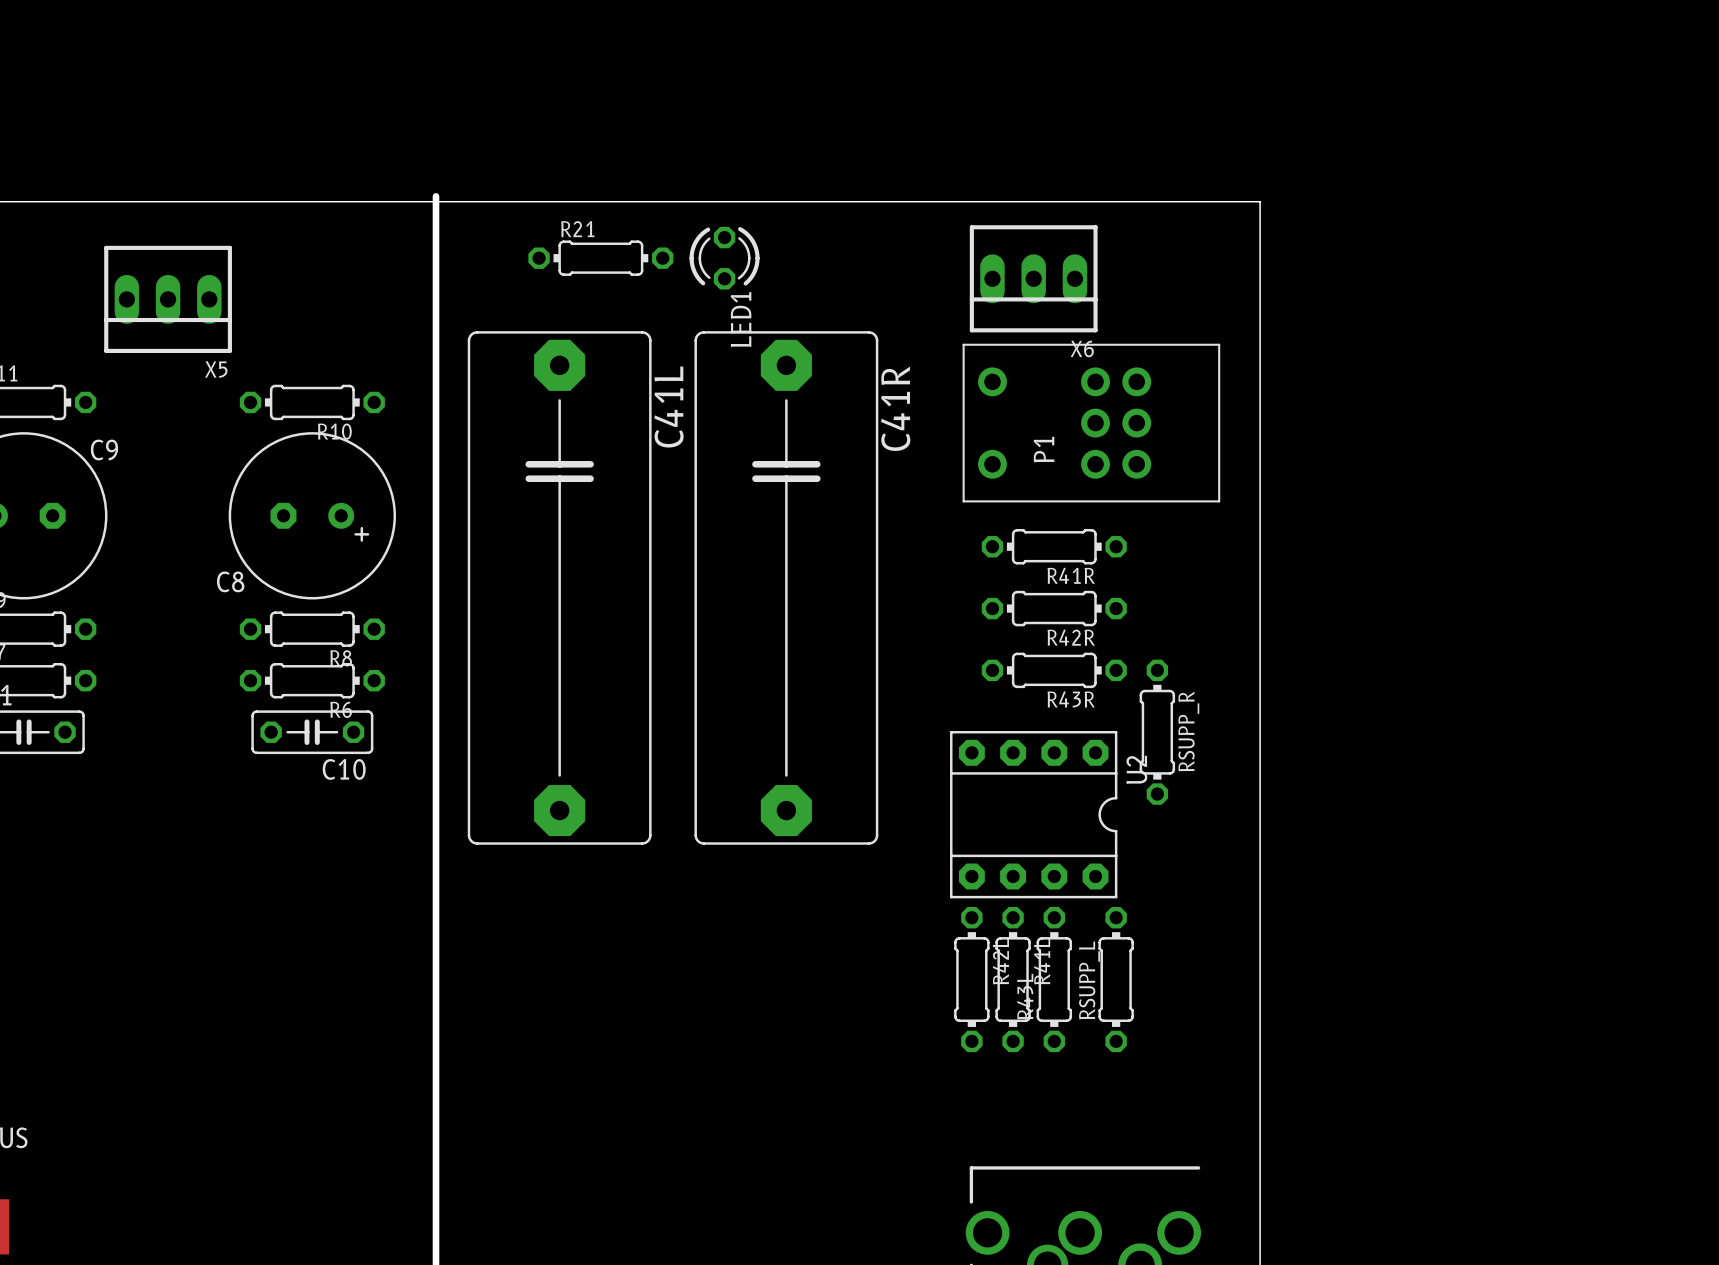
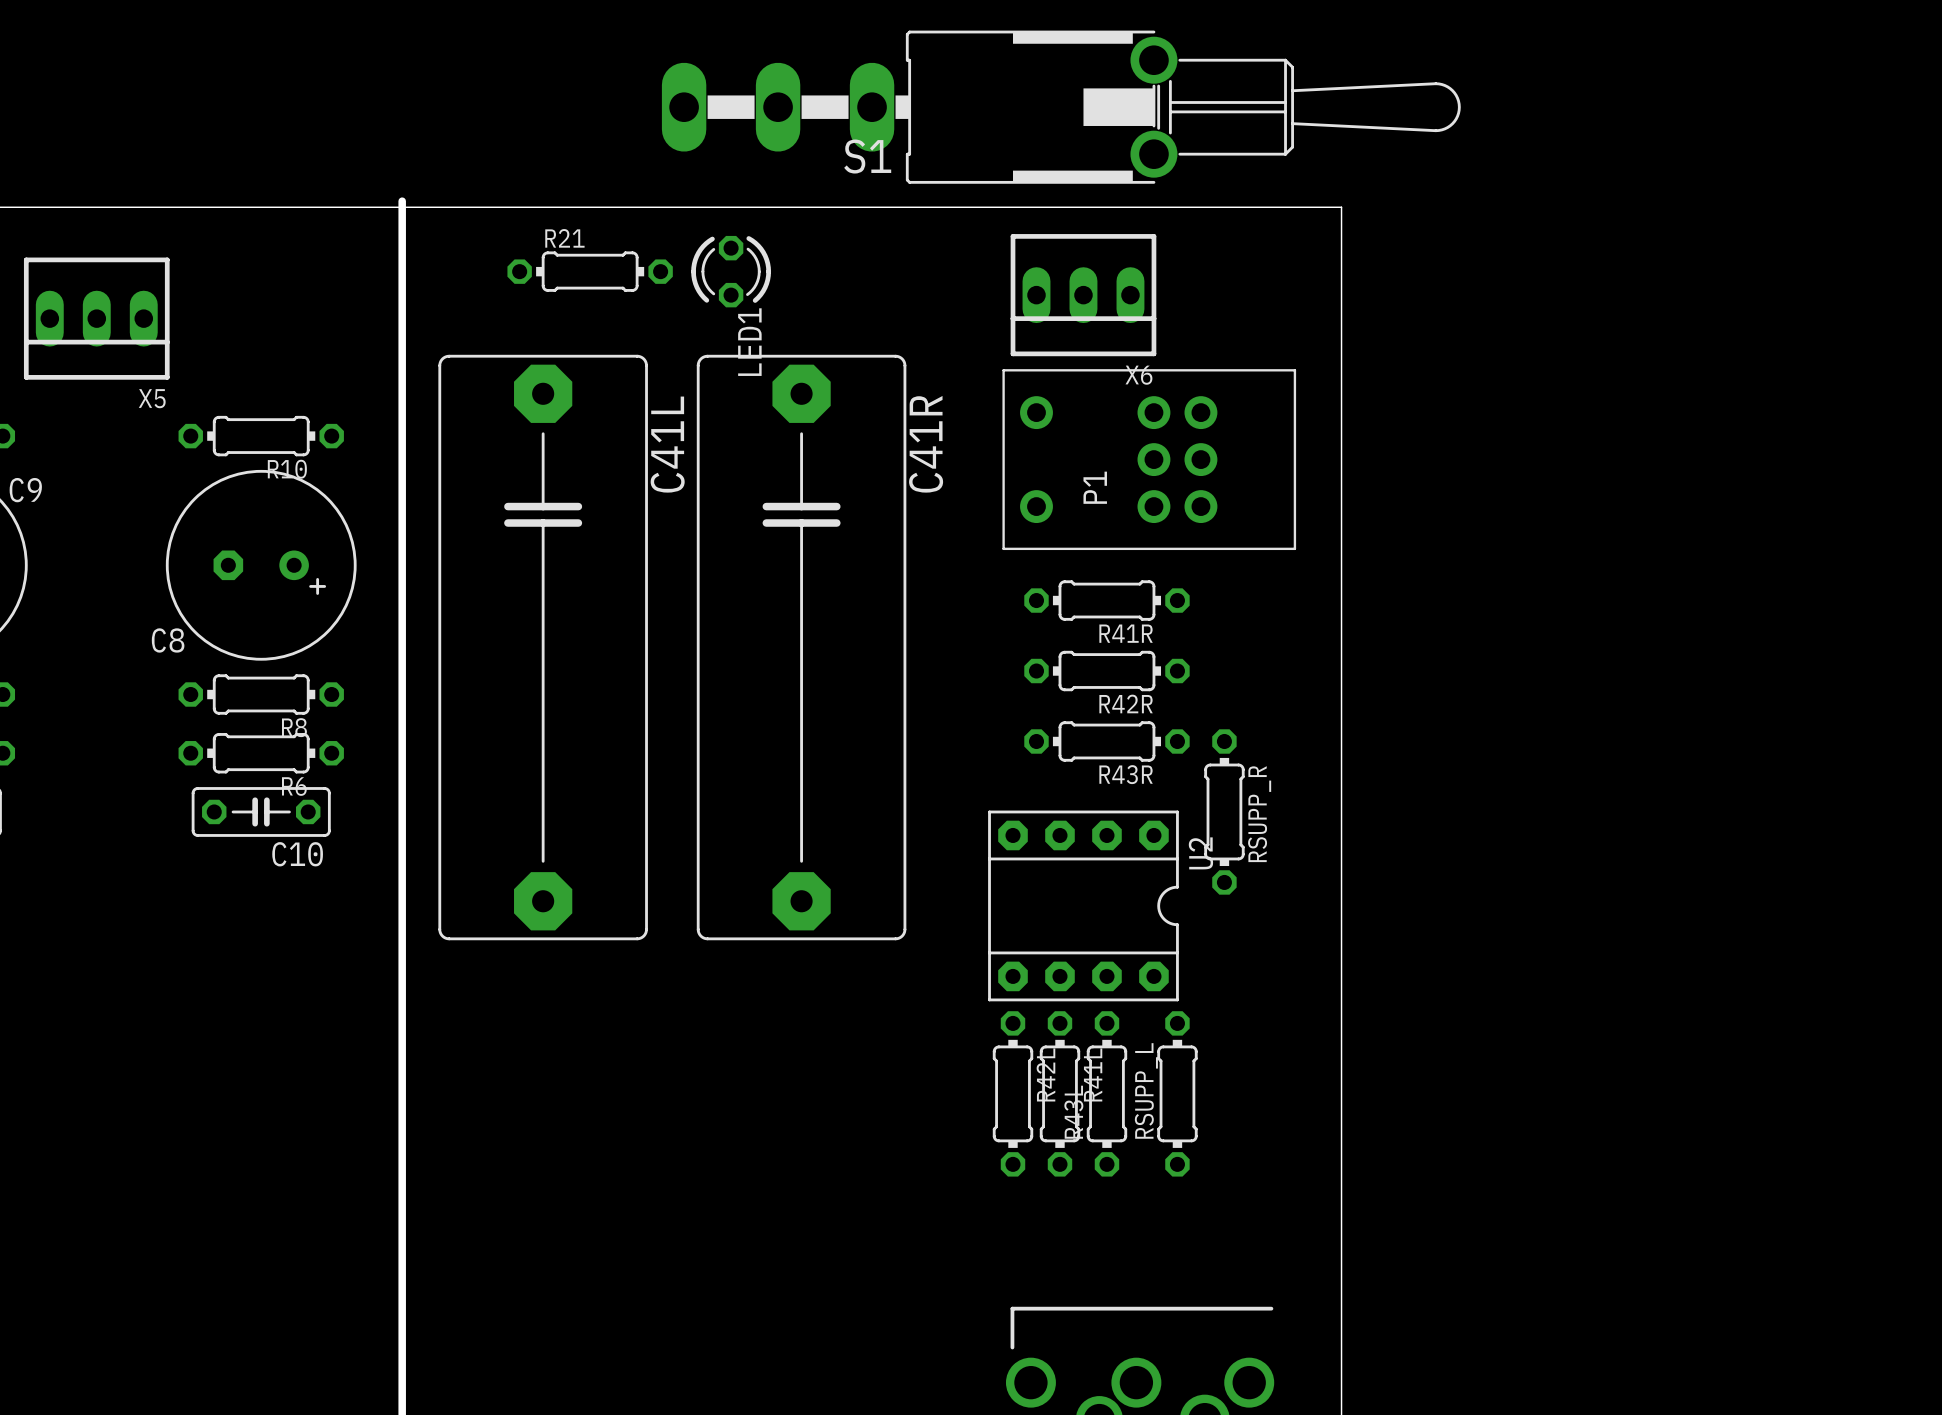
S1: none -> (1061, 107)

